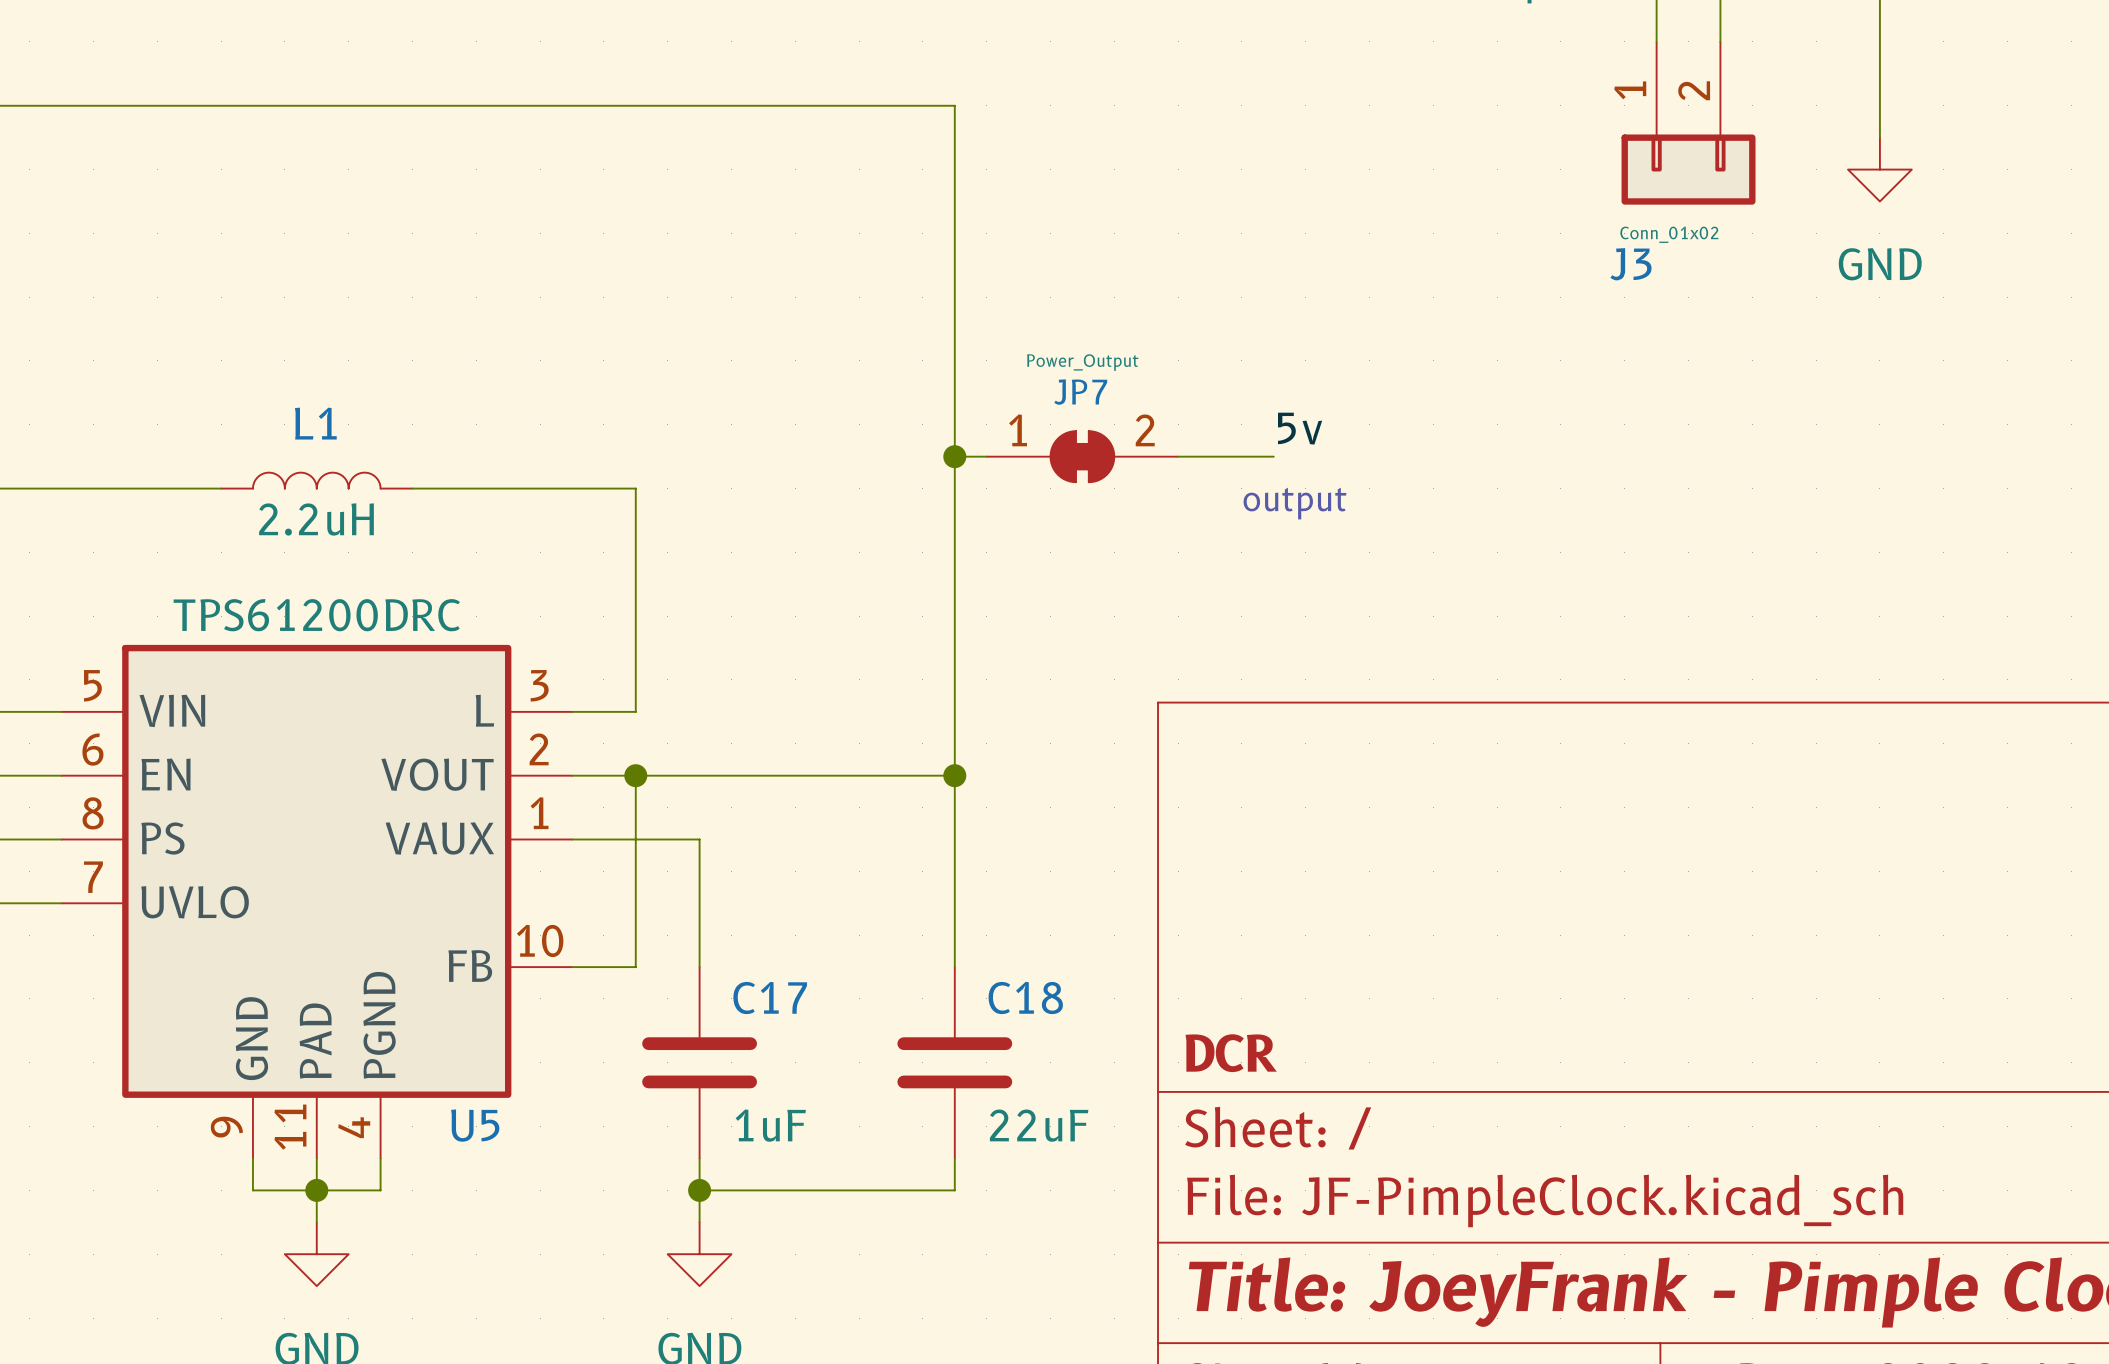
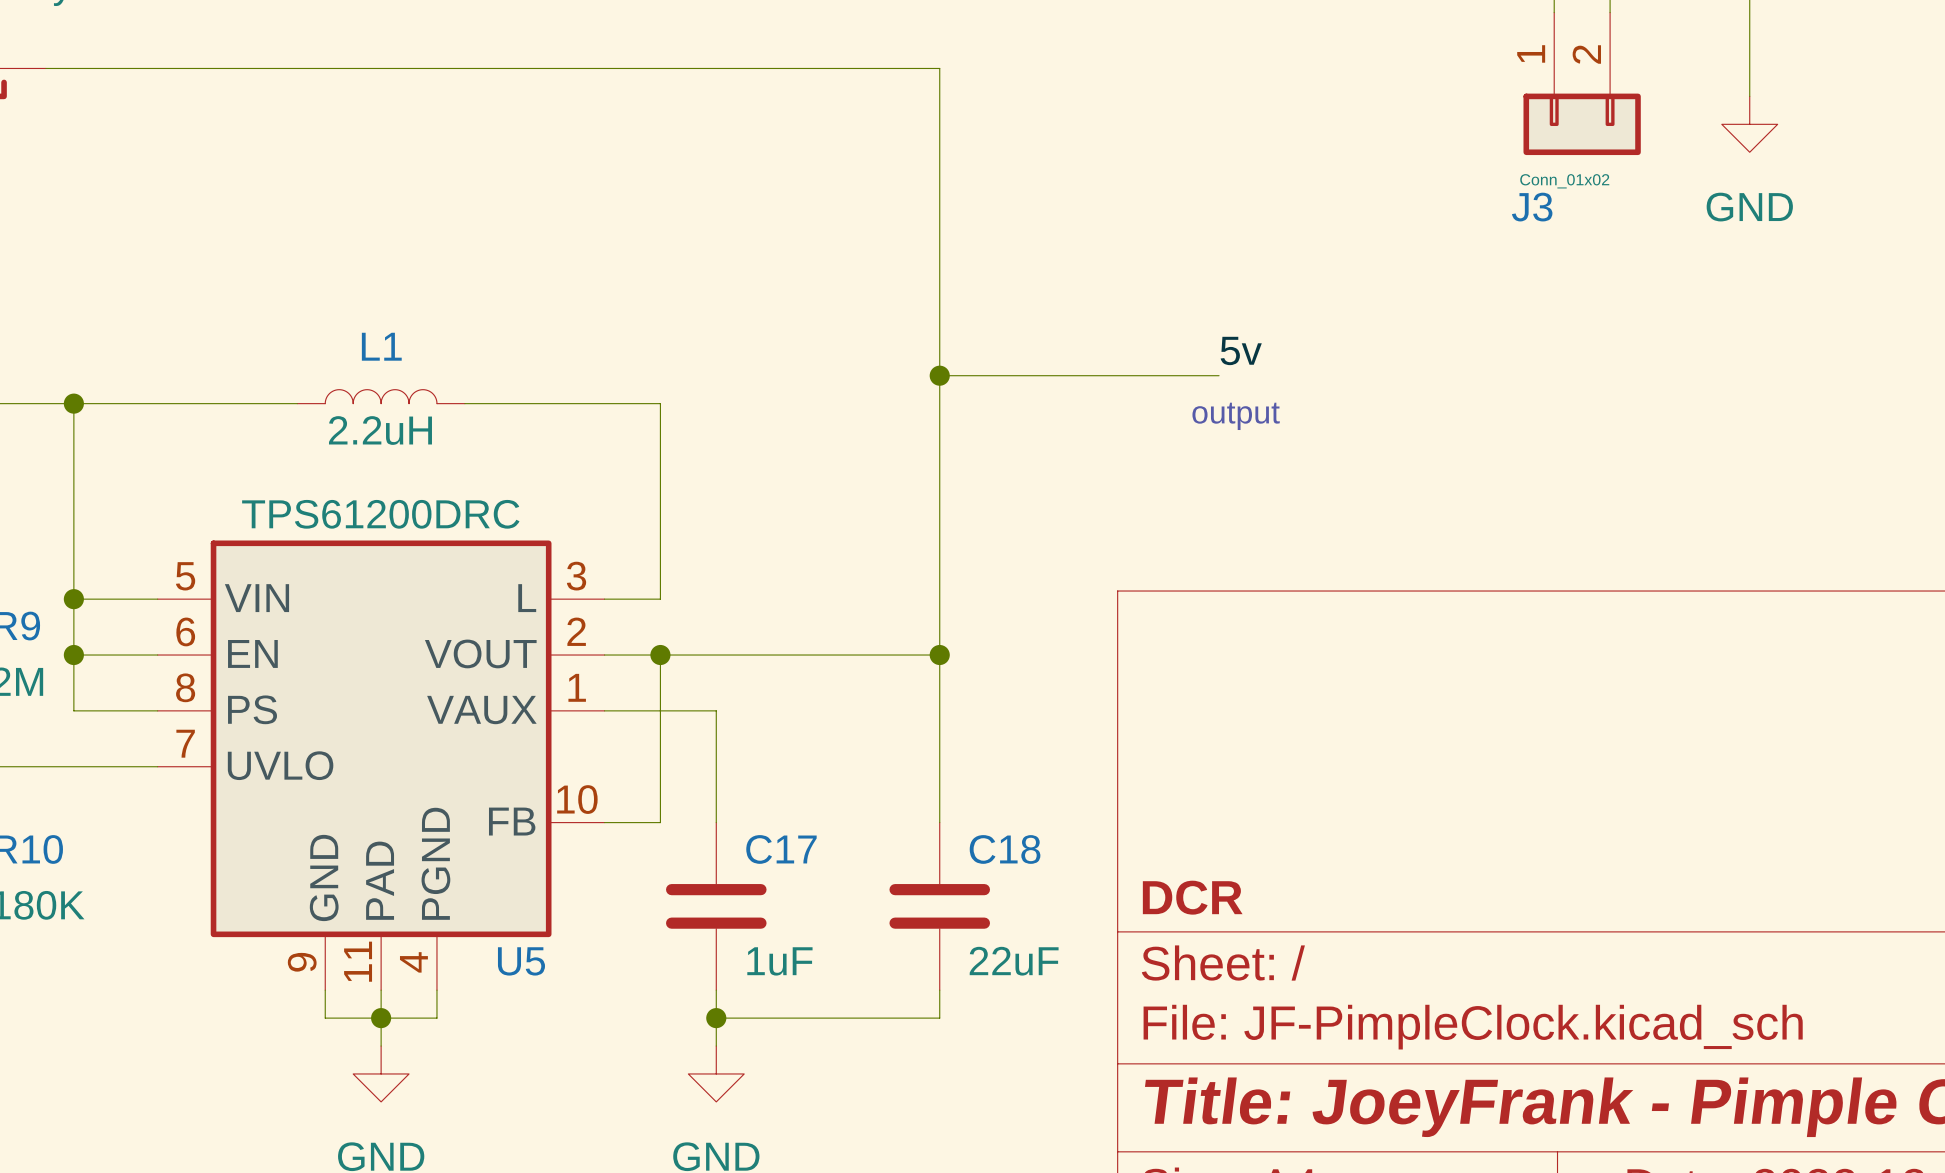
JP7: Power_Output (1082, 456) -> none

